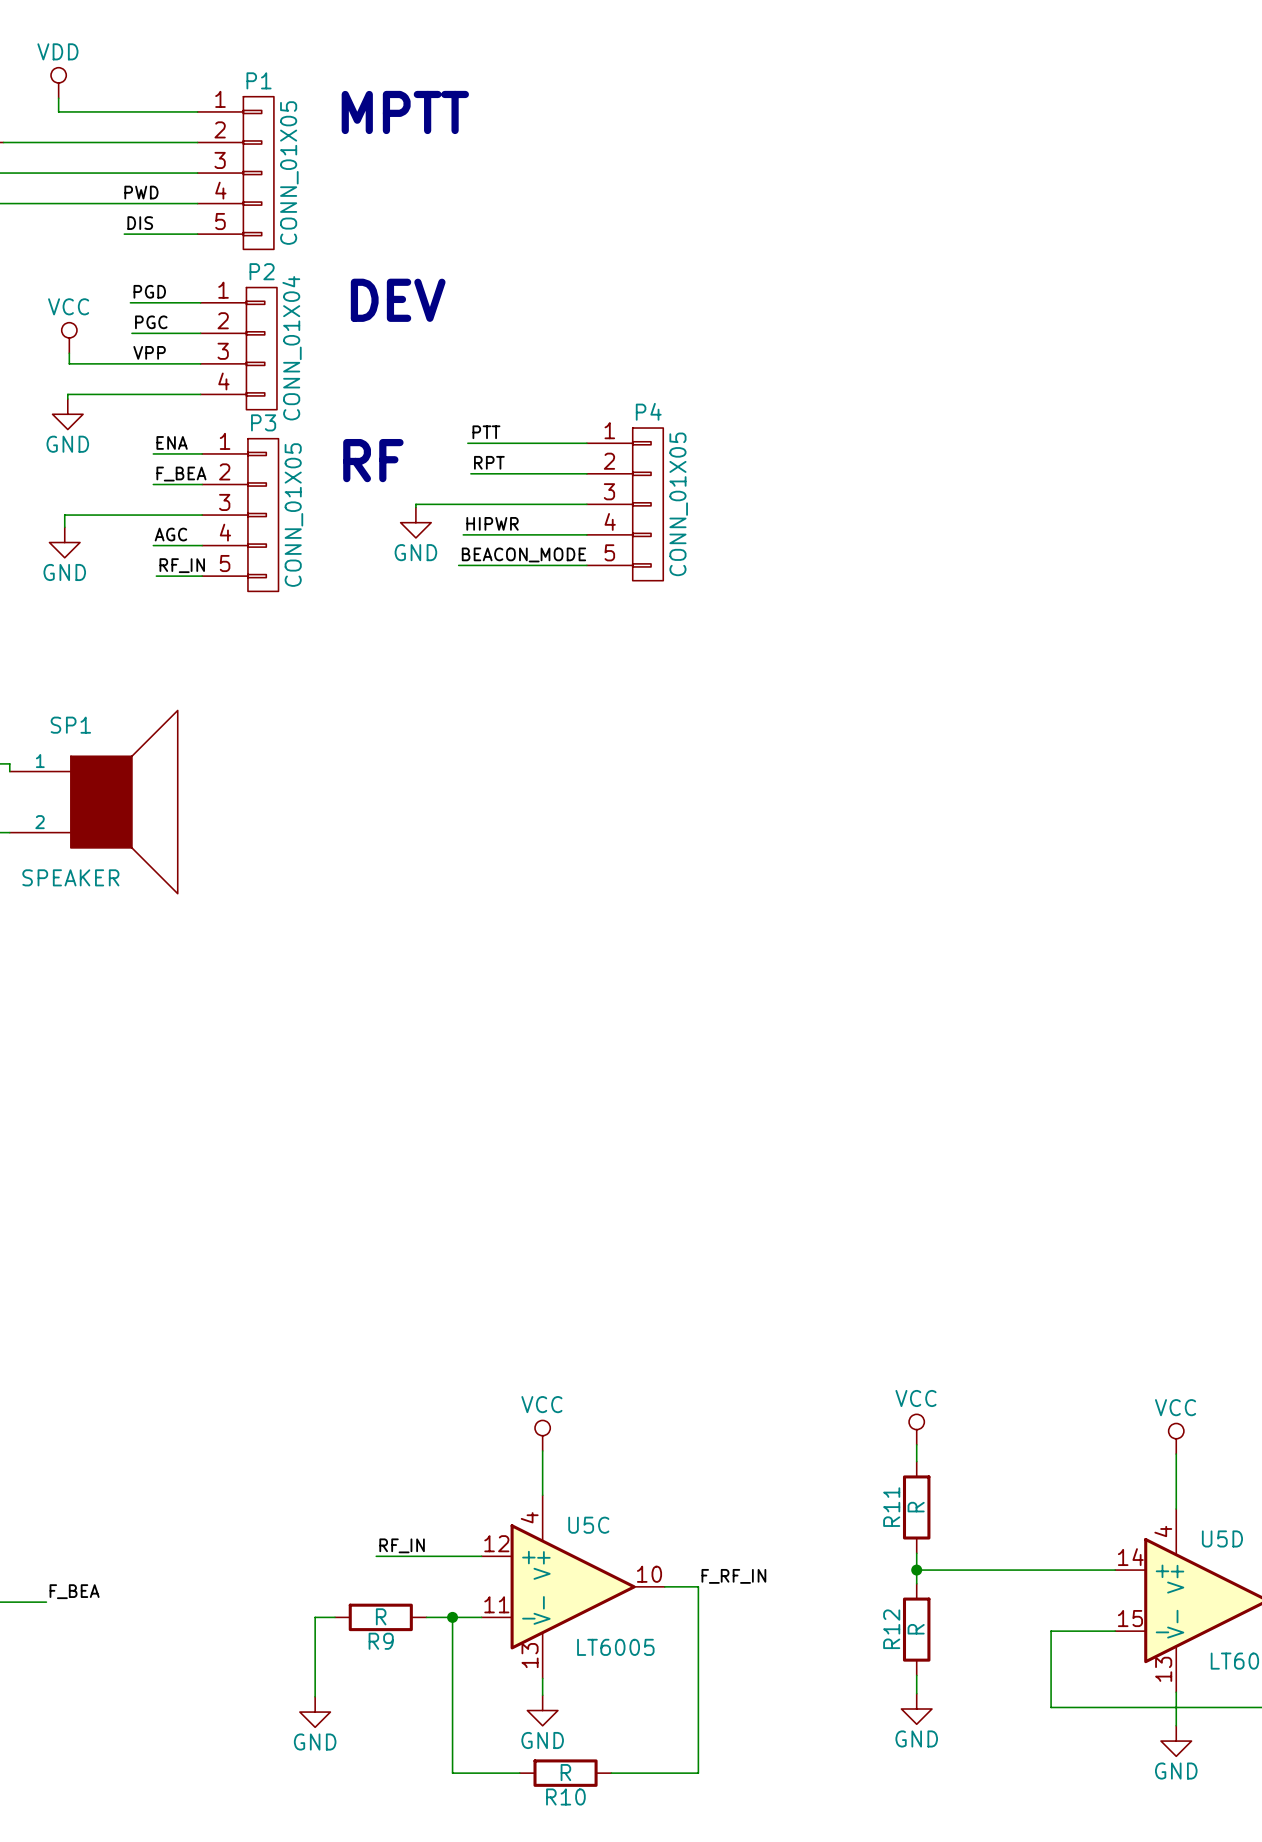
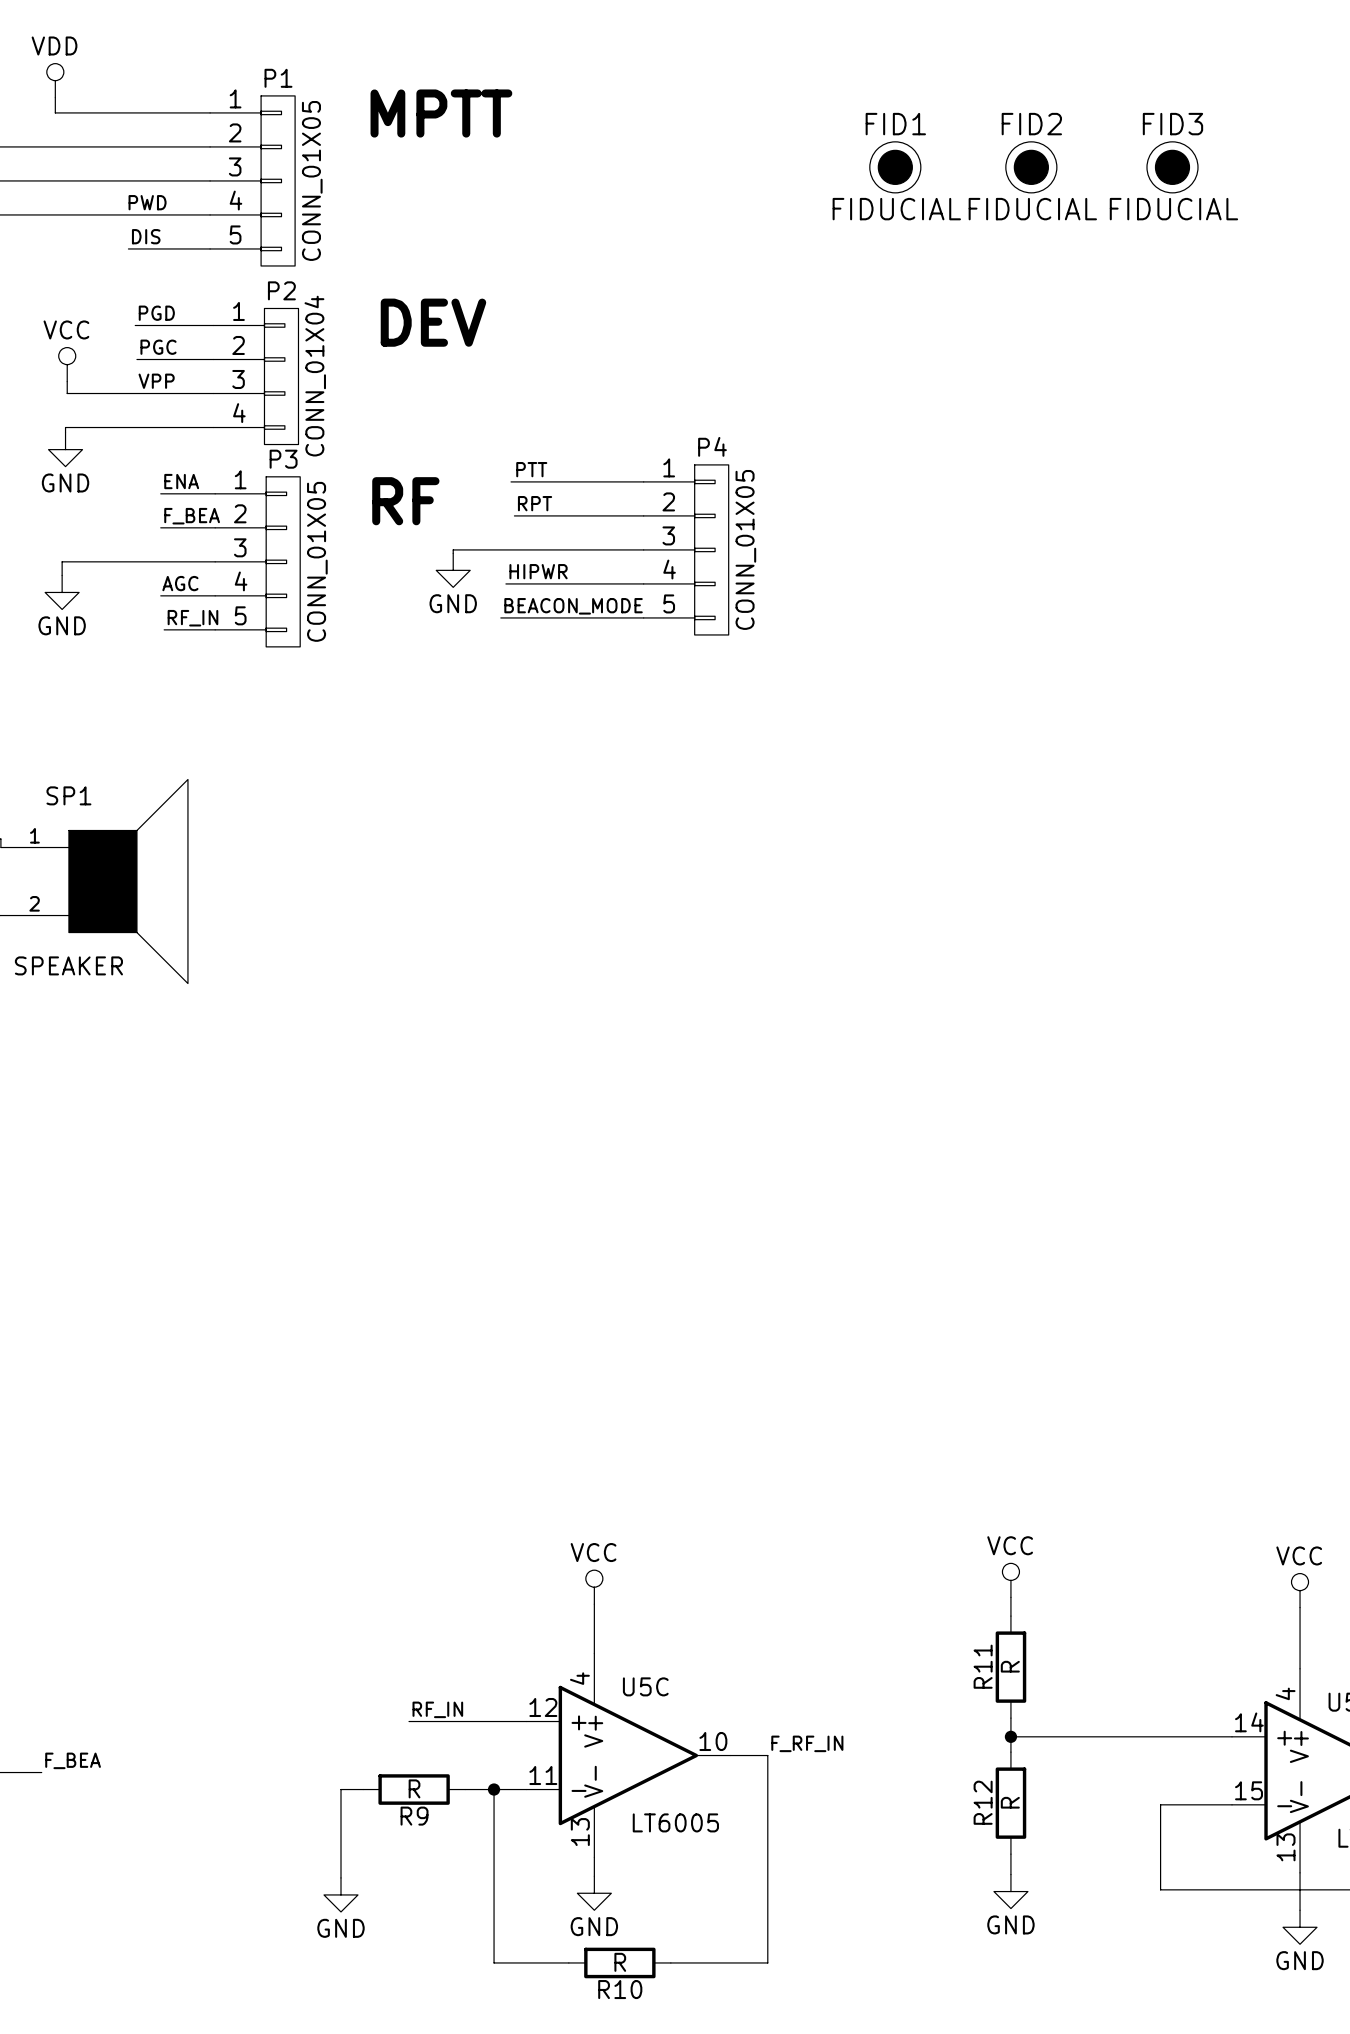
FID1: none -> FIDUCIAL (895, 167)
FID2: none -> FIDUCIAL (1031, 167)
FID3: none -> FIDUCIAL (1172, 167)

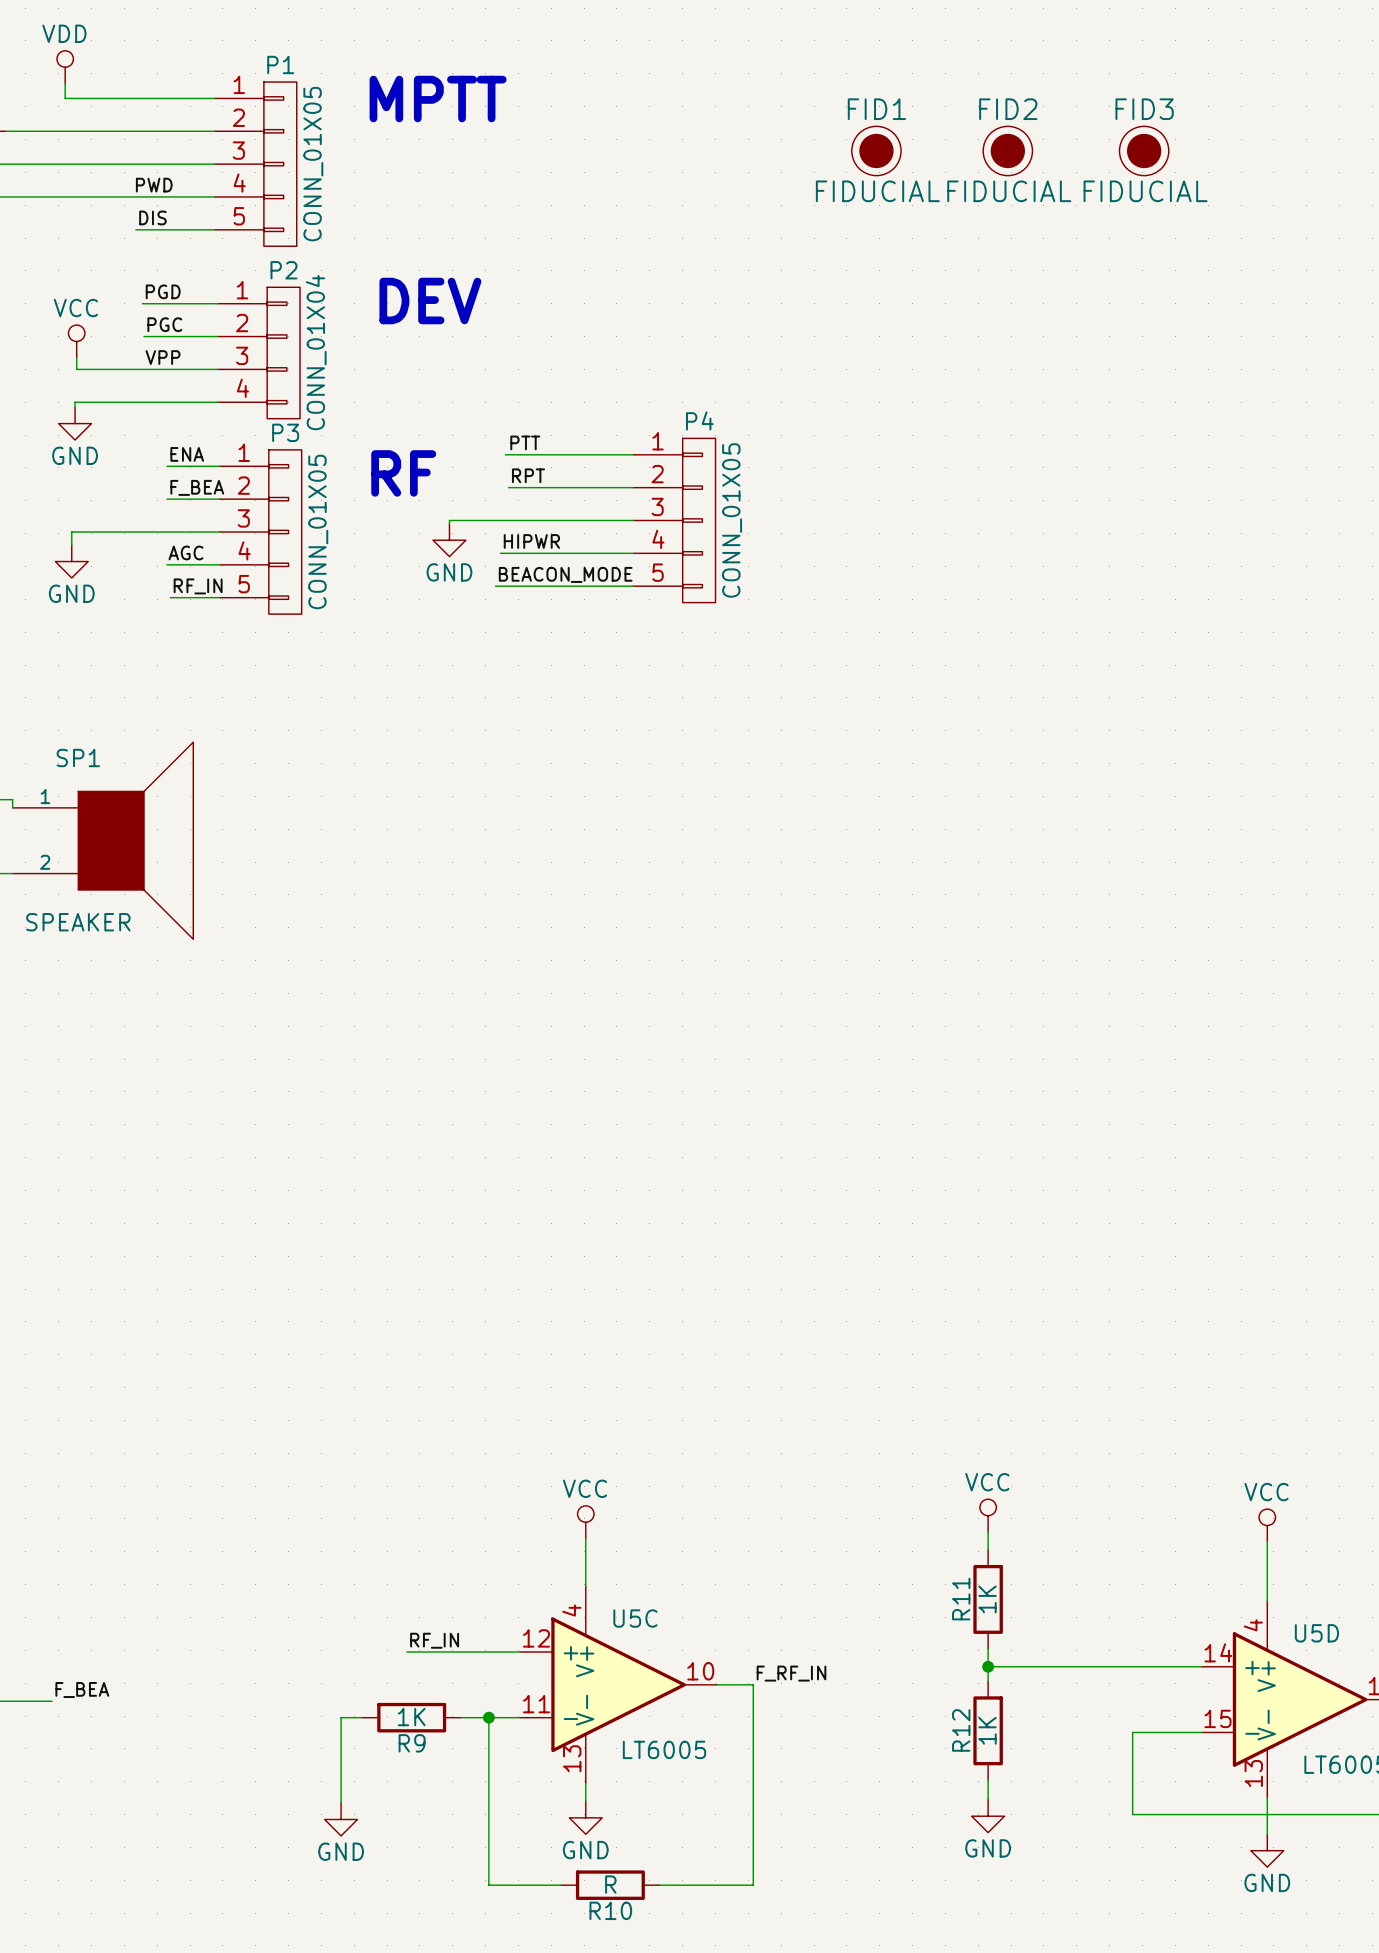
R11 value: R (1010, 1666) -> 1K (987, 1599)
R9 value: R (414, 1788) -> 1K (411, 1717)
R12 value: R (1010, 1802) -> 1K (987, 1730)

